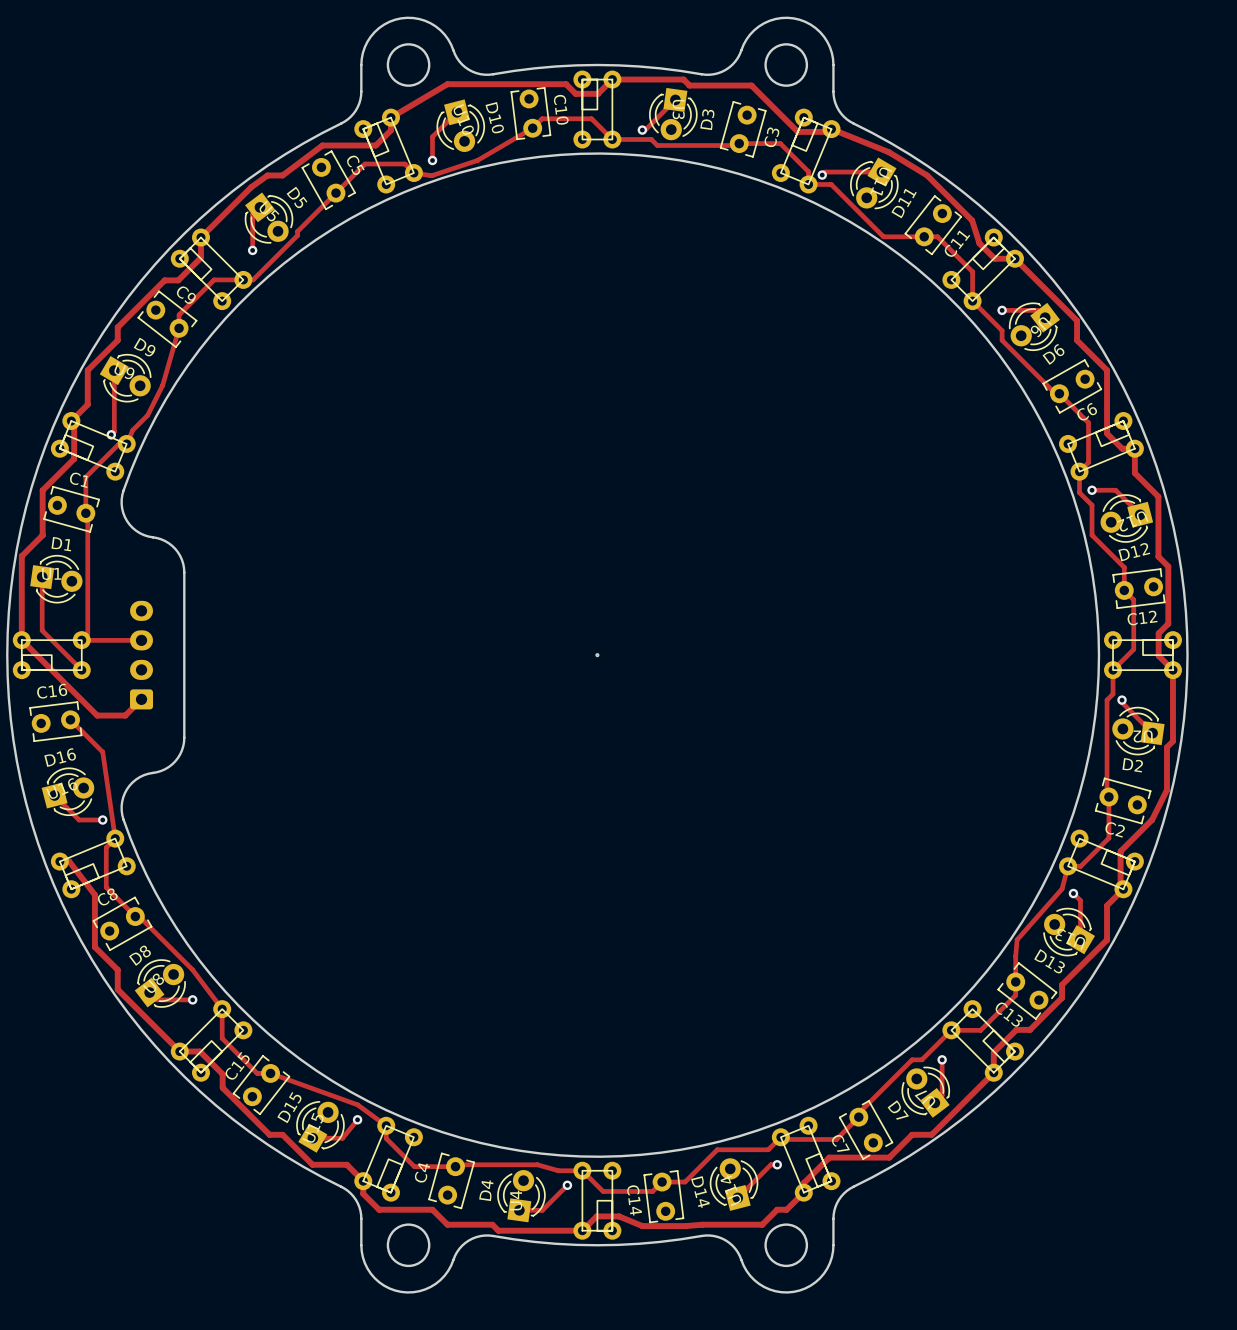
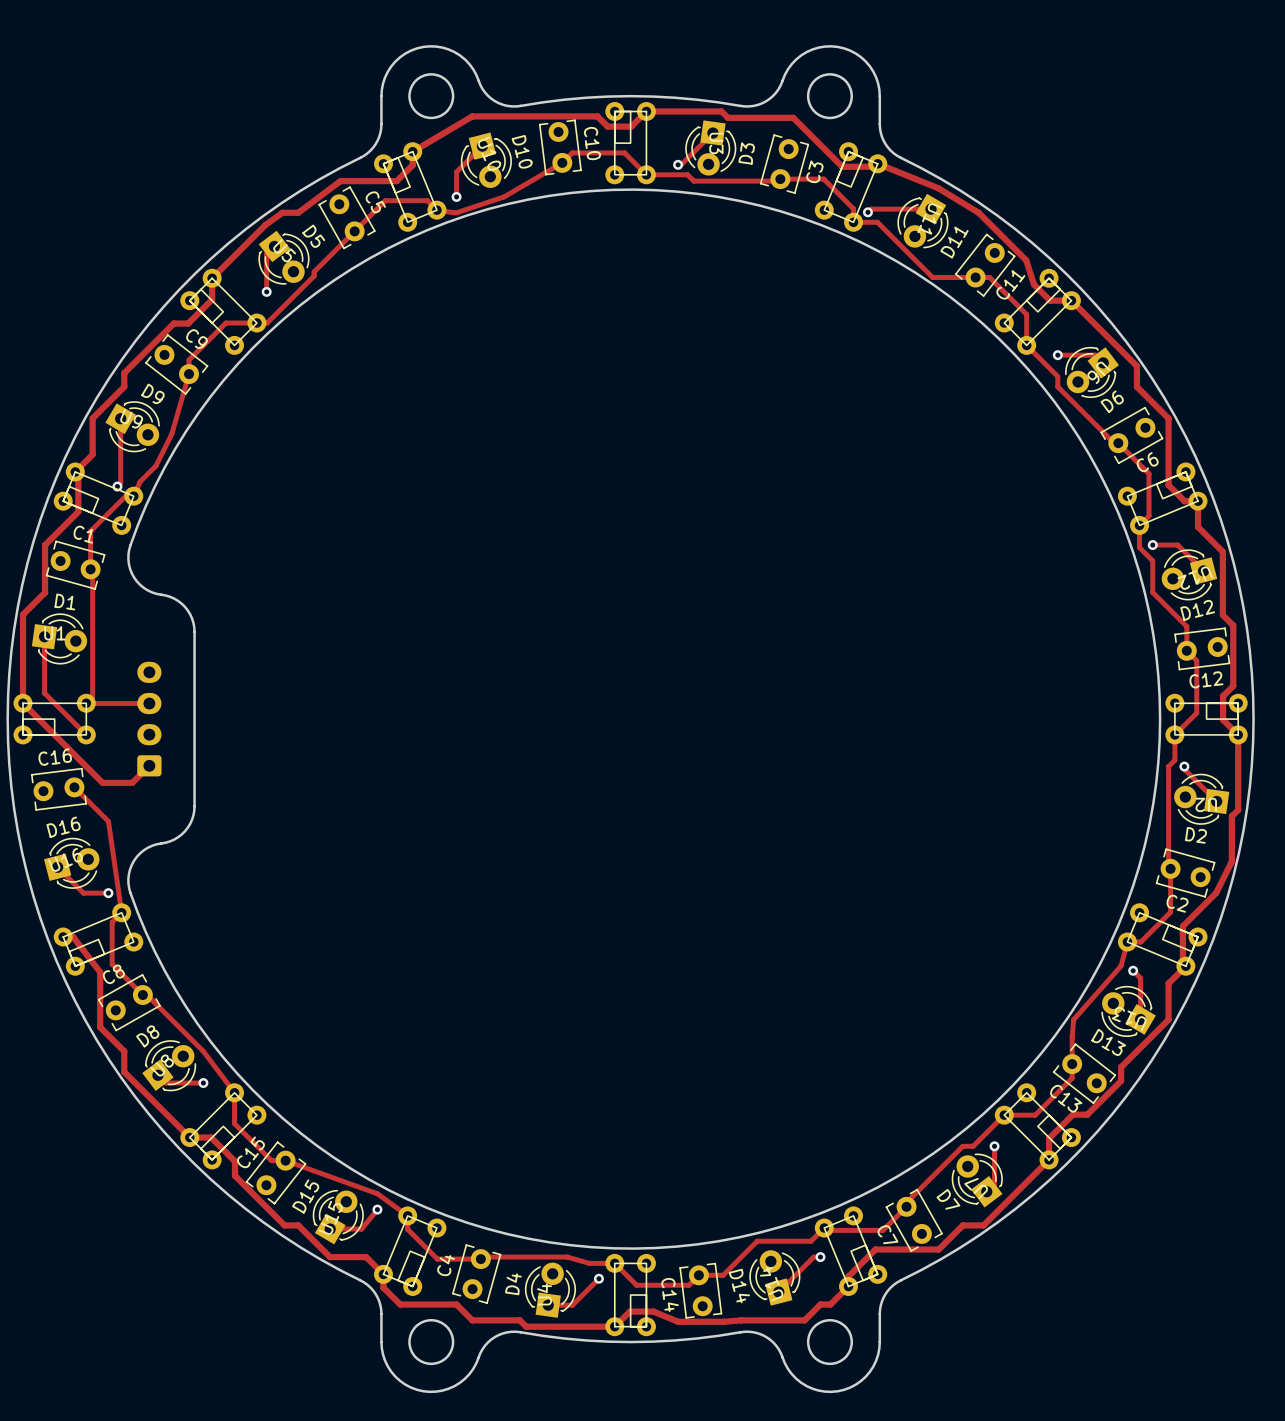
round board edge: [596, 653, 599, 657] -> none

